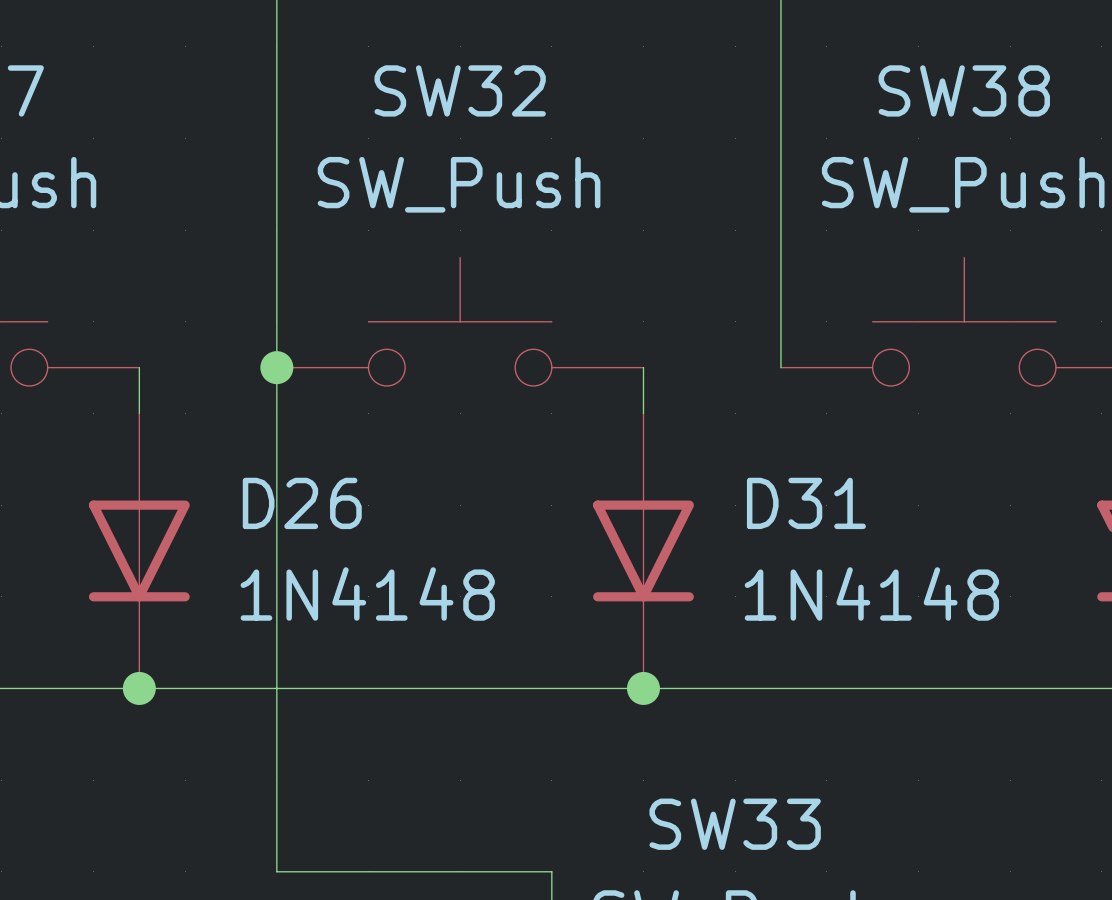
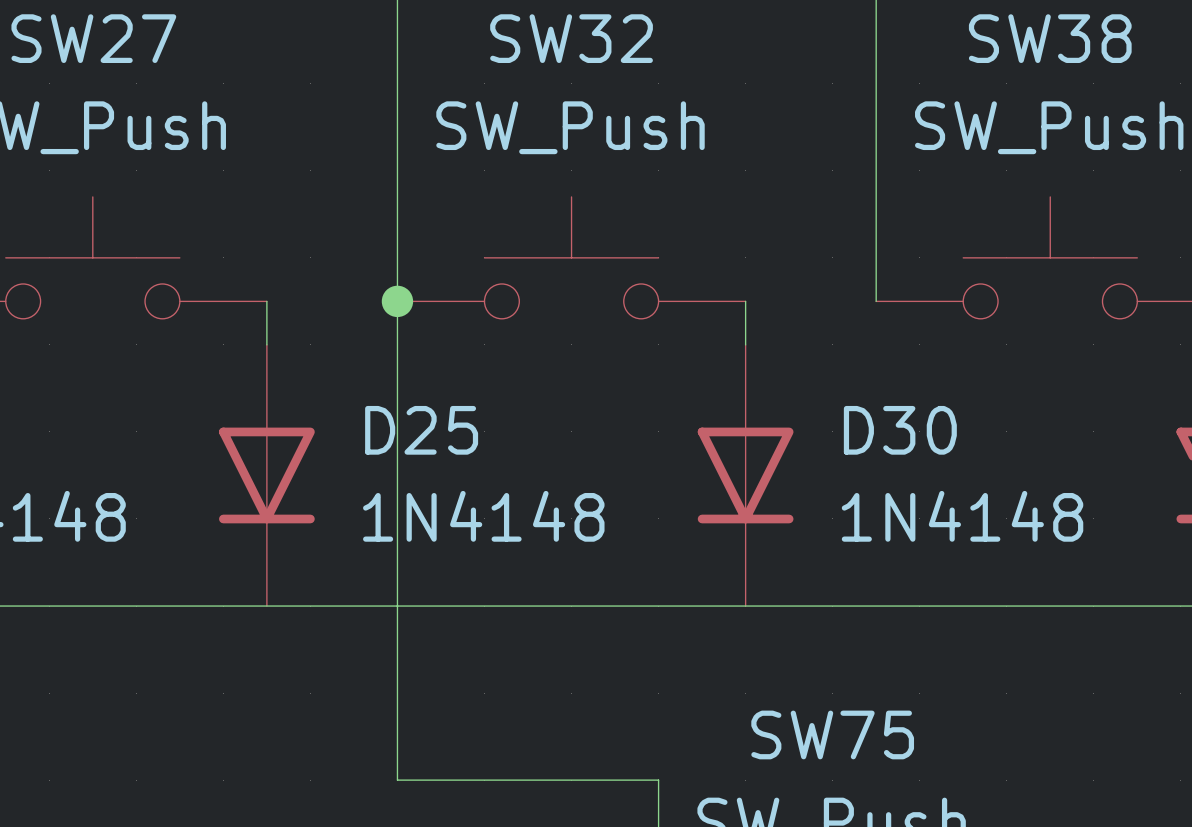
D26 name: D26 (302, 503) -> D25 (421, 430)
D31 name: D31 (806, 503) -> D30 (900, 430)
junction: (139, 688) -> none
junction: (643, 688) -> none
SW33 name: SW33 (735, 824) -> SW75 (832, 734)

